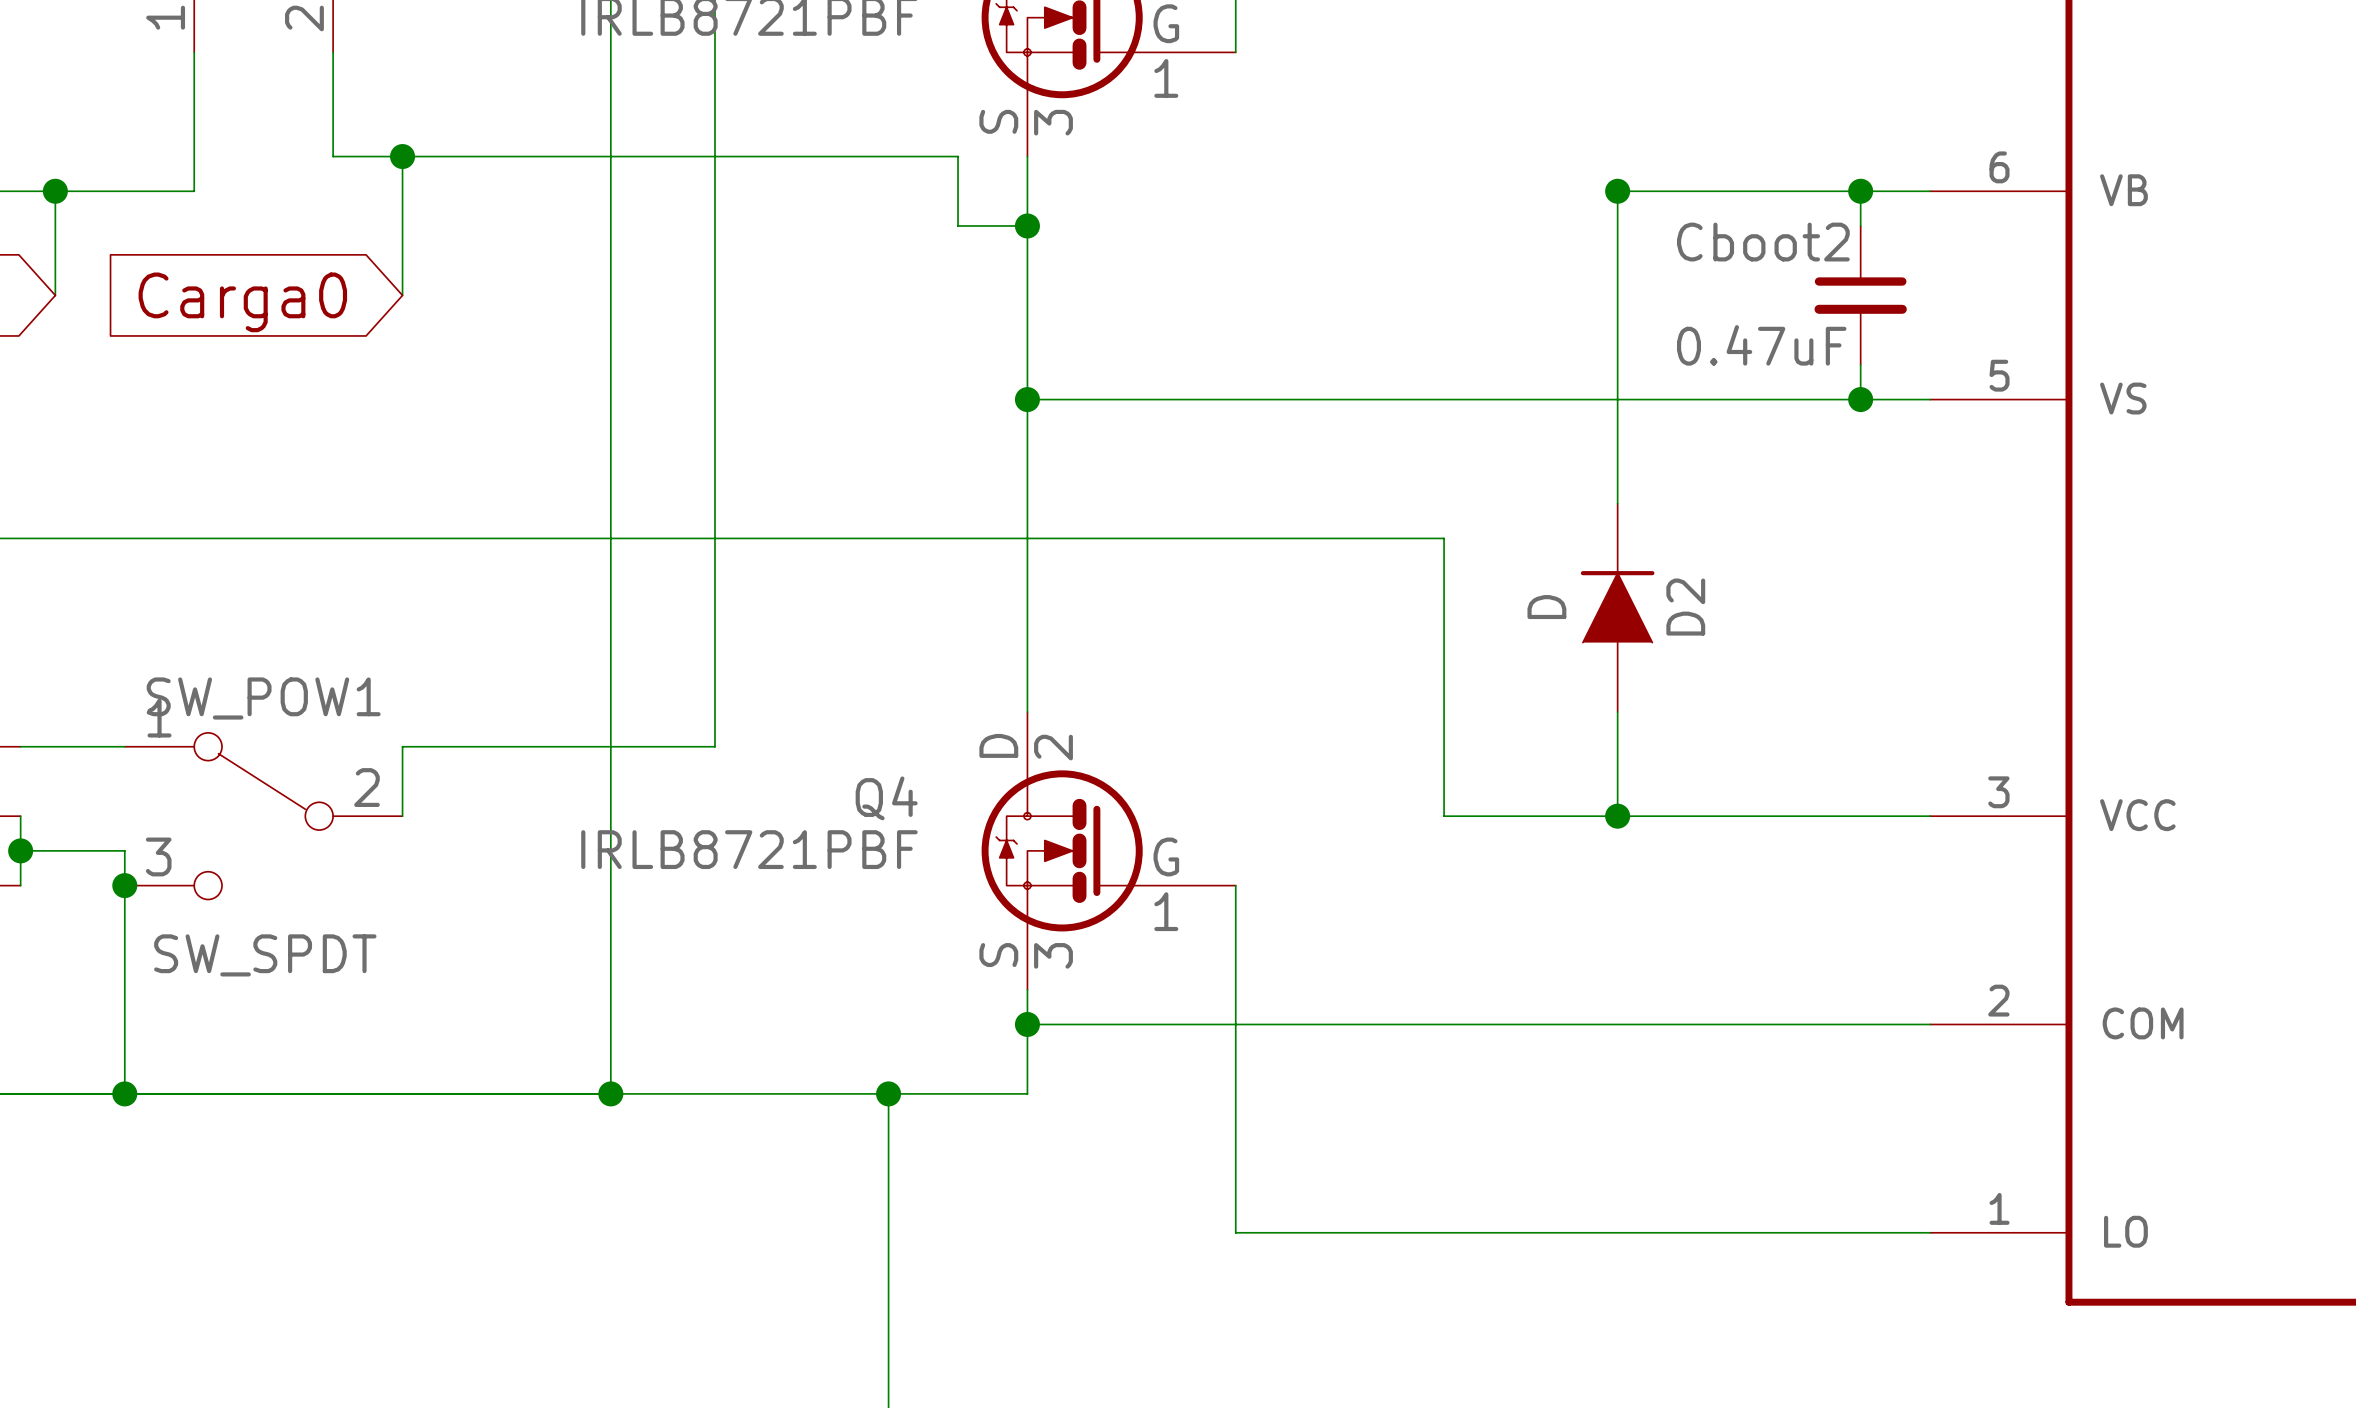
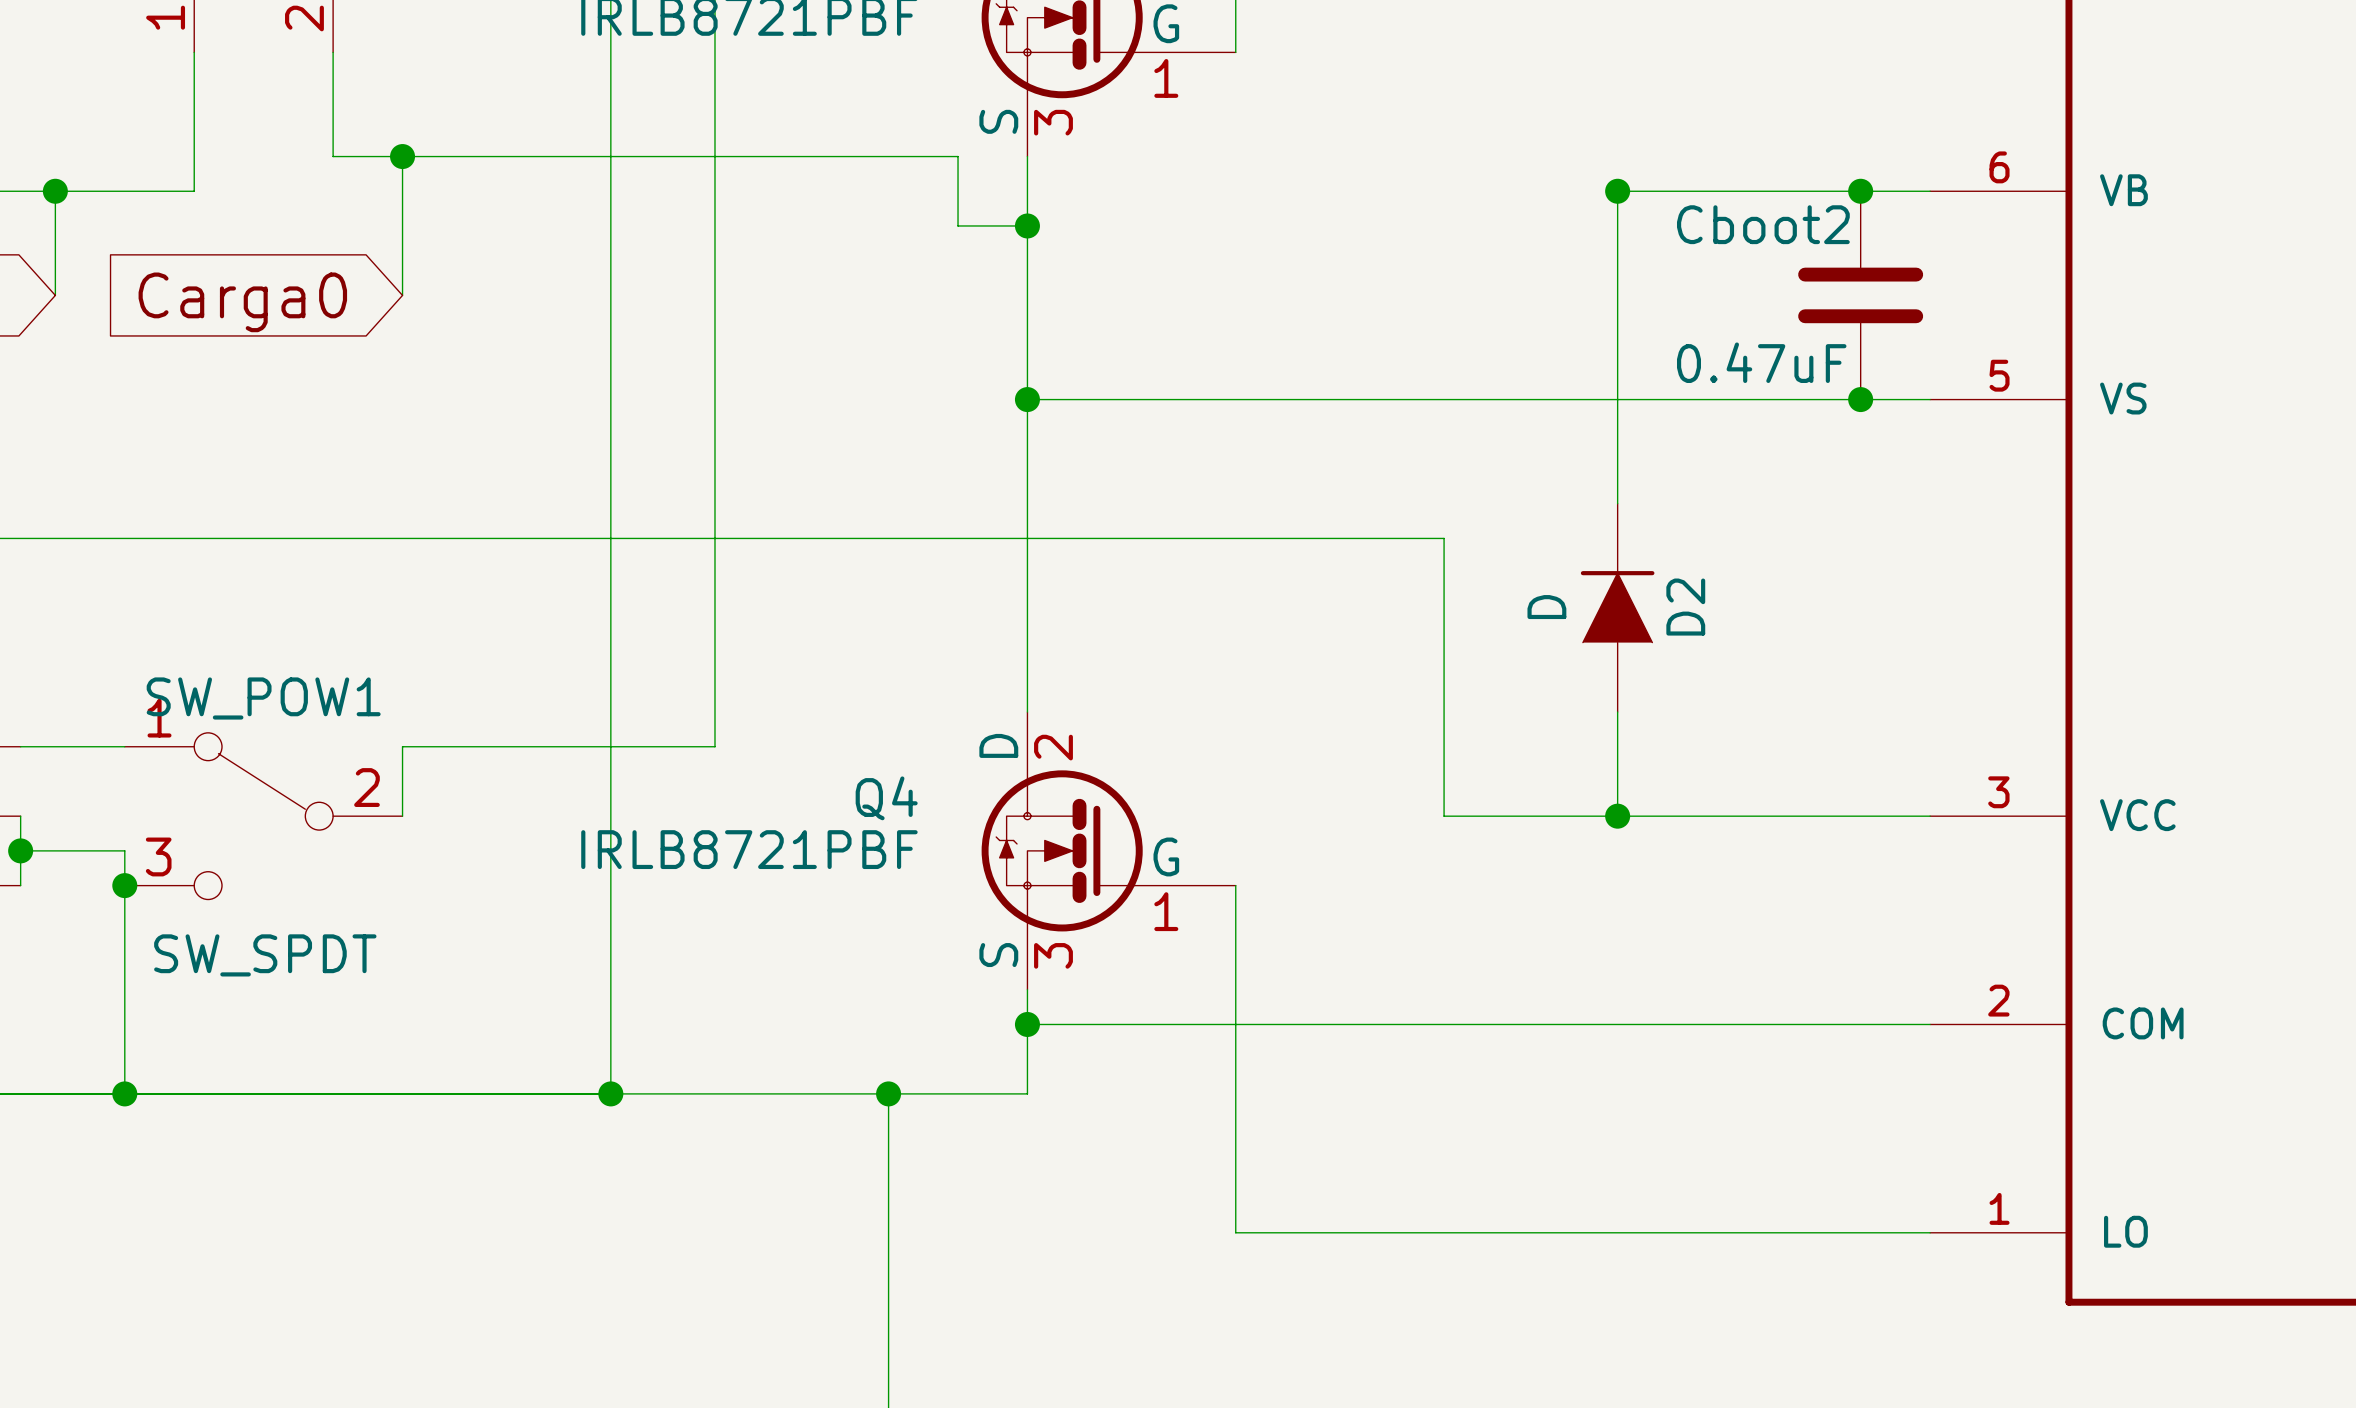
Cboot2 symbol: [1814, 225, 1907, 365] -> [1798, 191, 1924, 400]

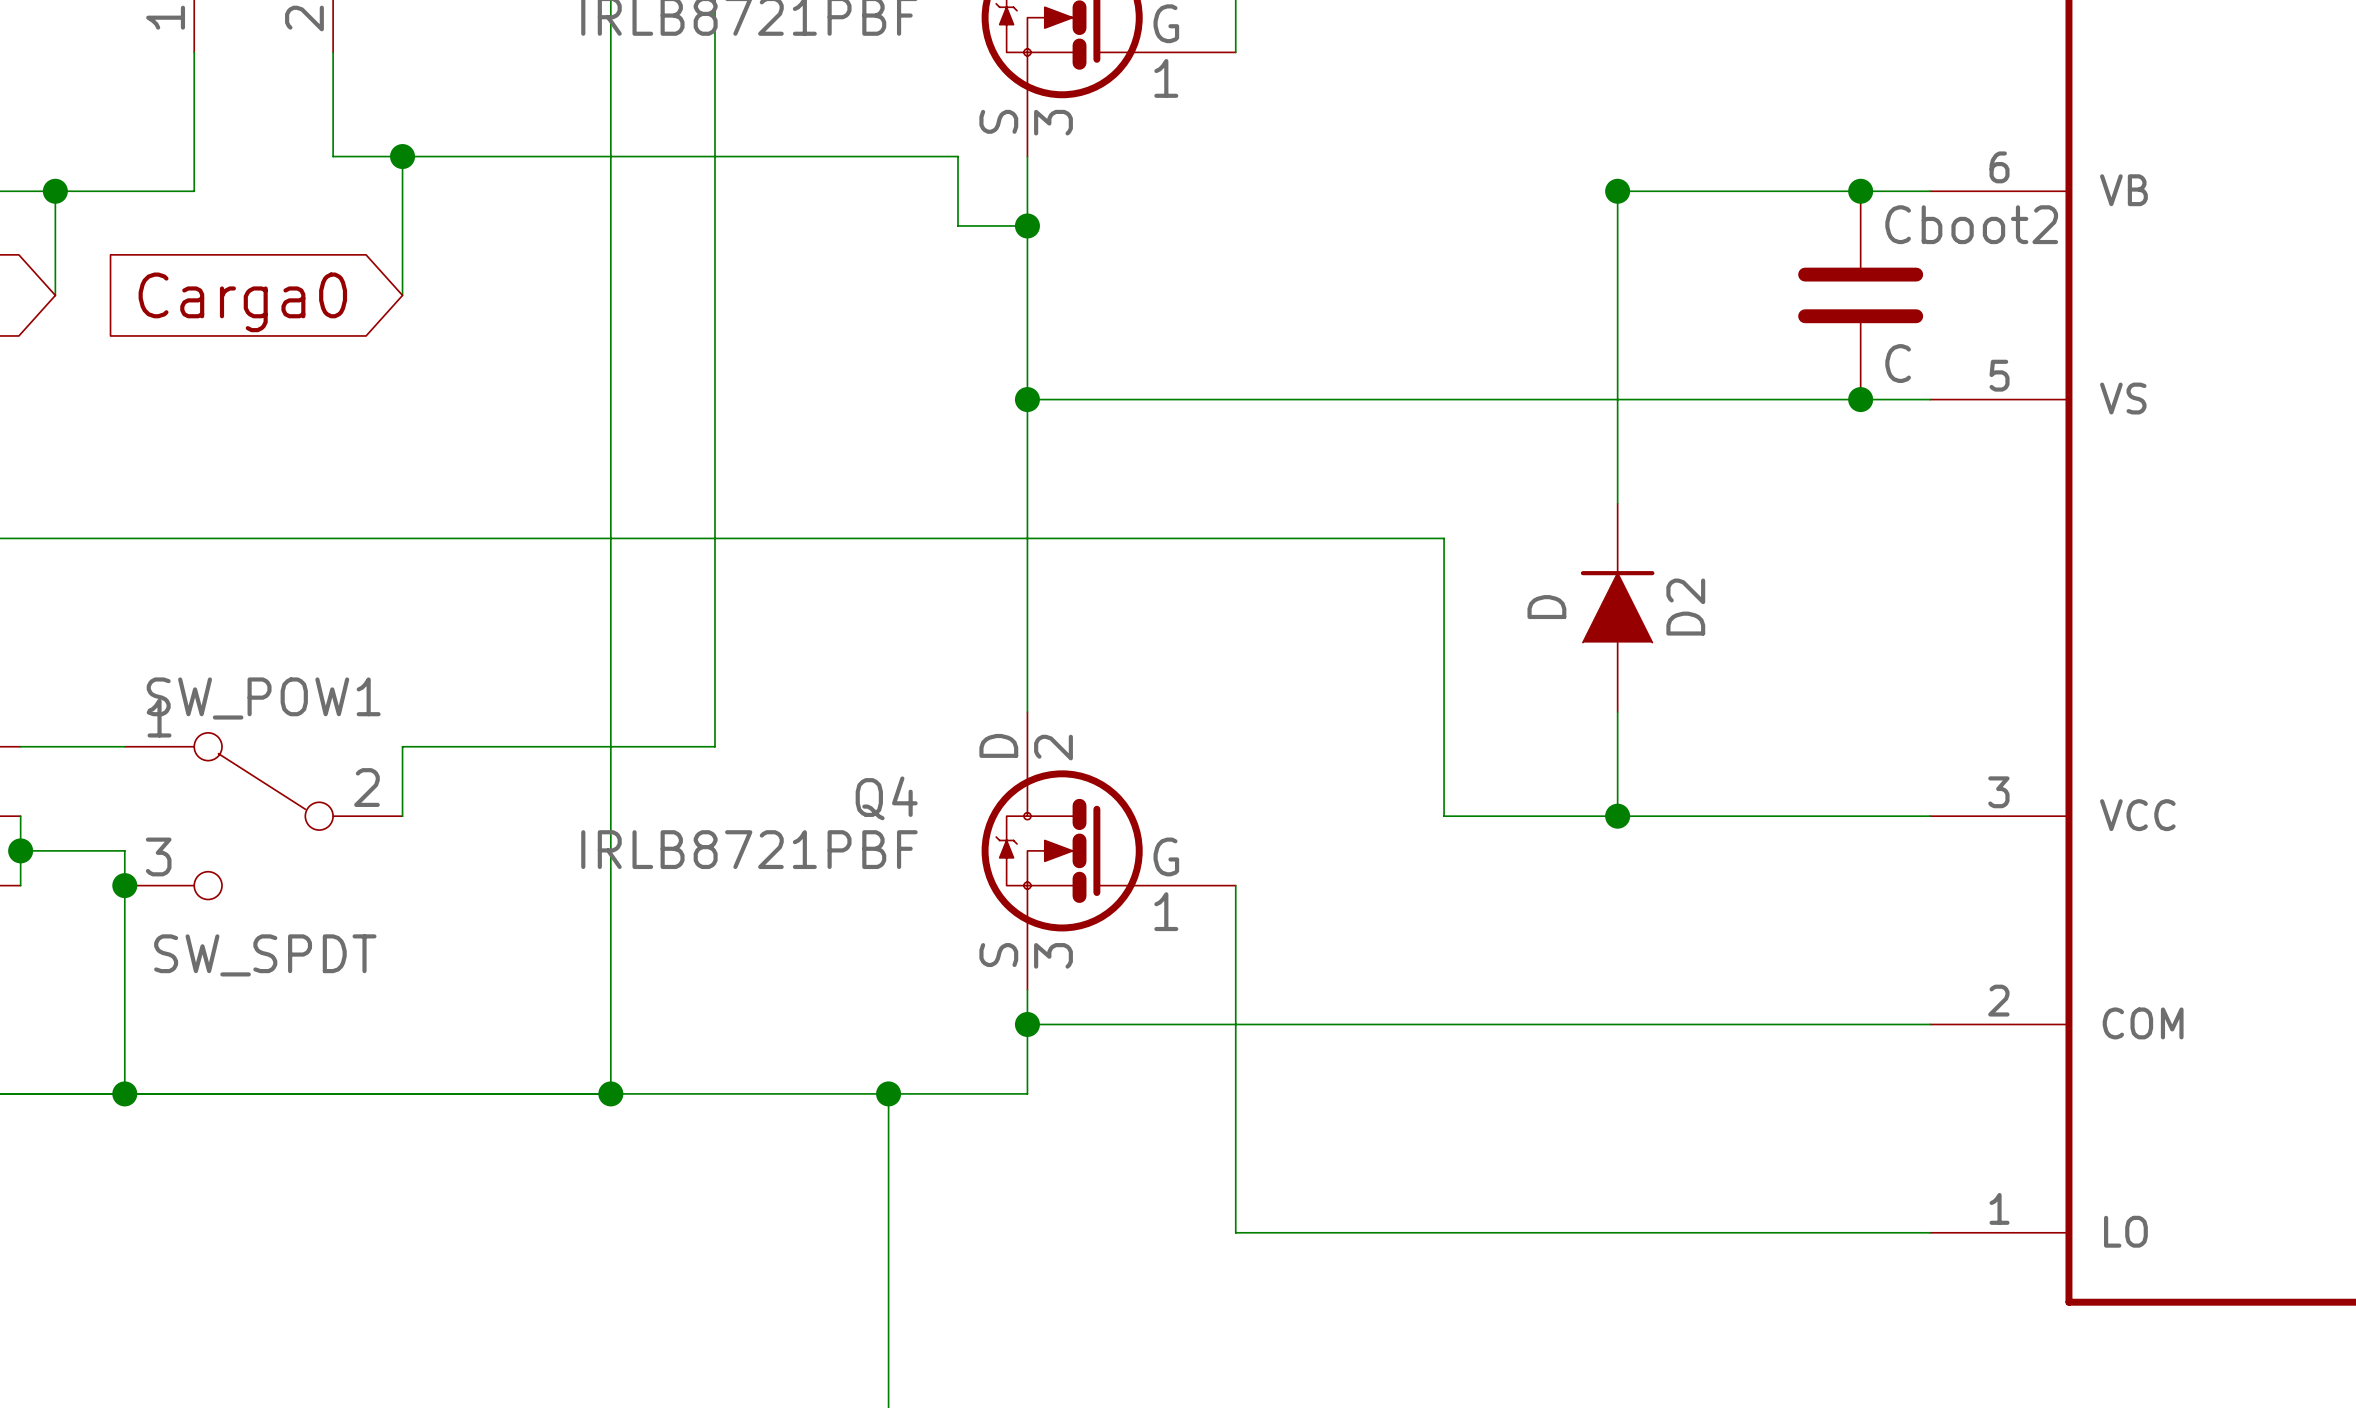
Cboot2 name position: Cboot2 (1763, 224) -> Cboot2 (1971, 224)
Cboot2 value: 0.47uF (1761, 362) -> C (1898, 363)

